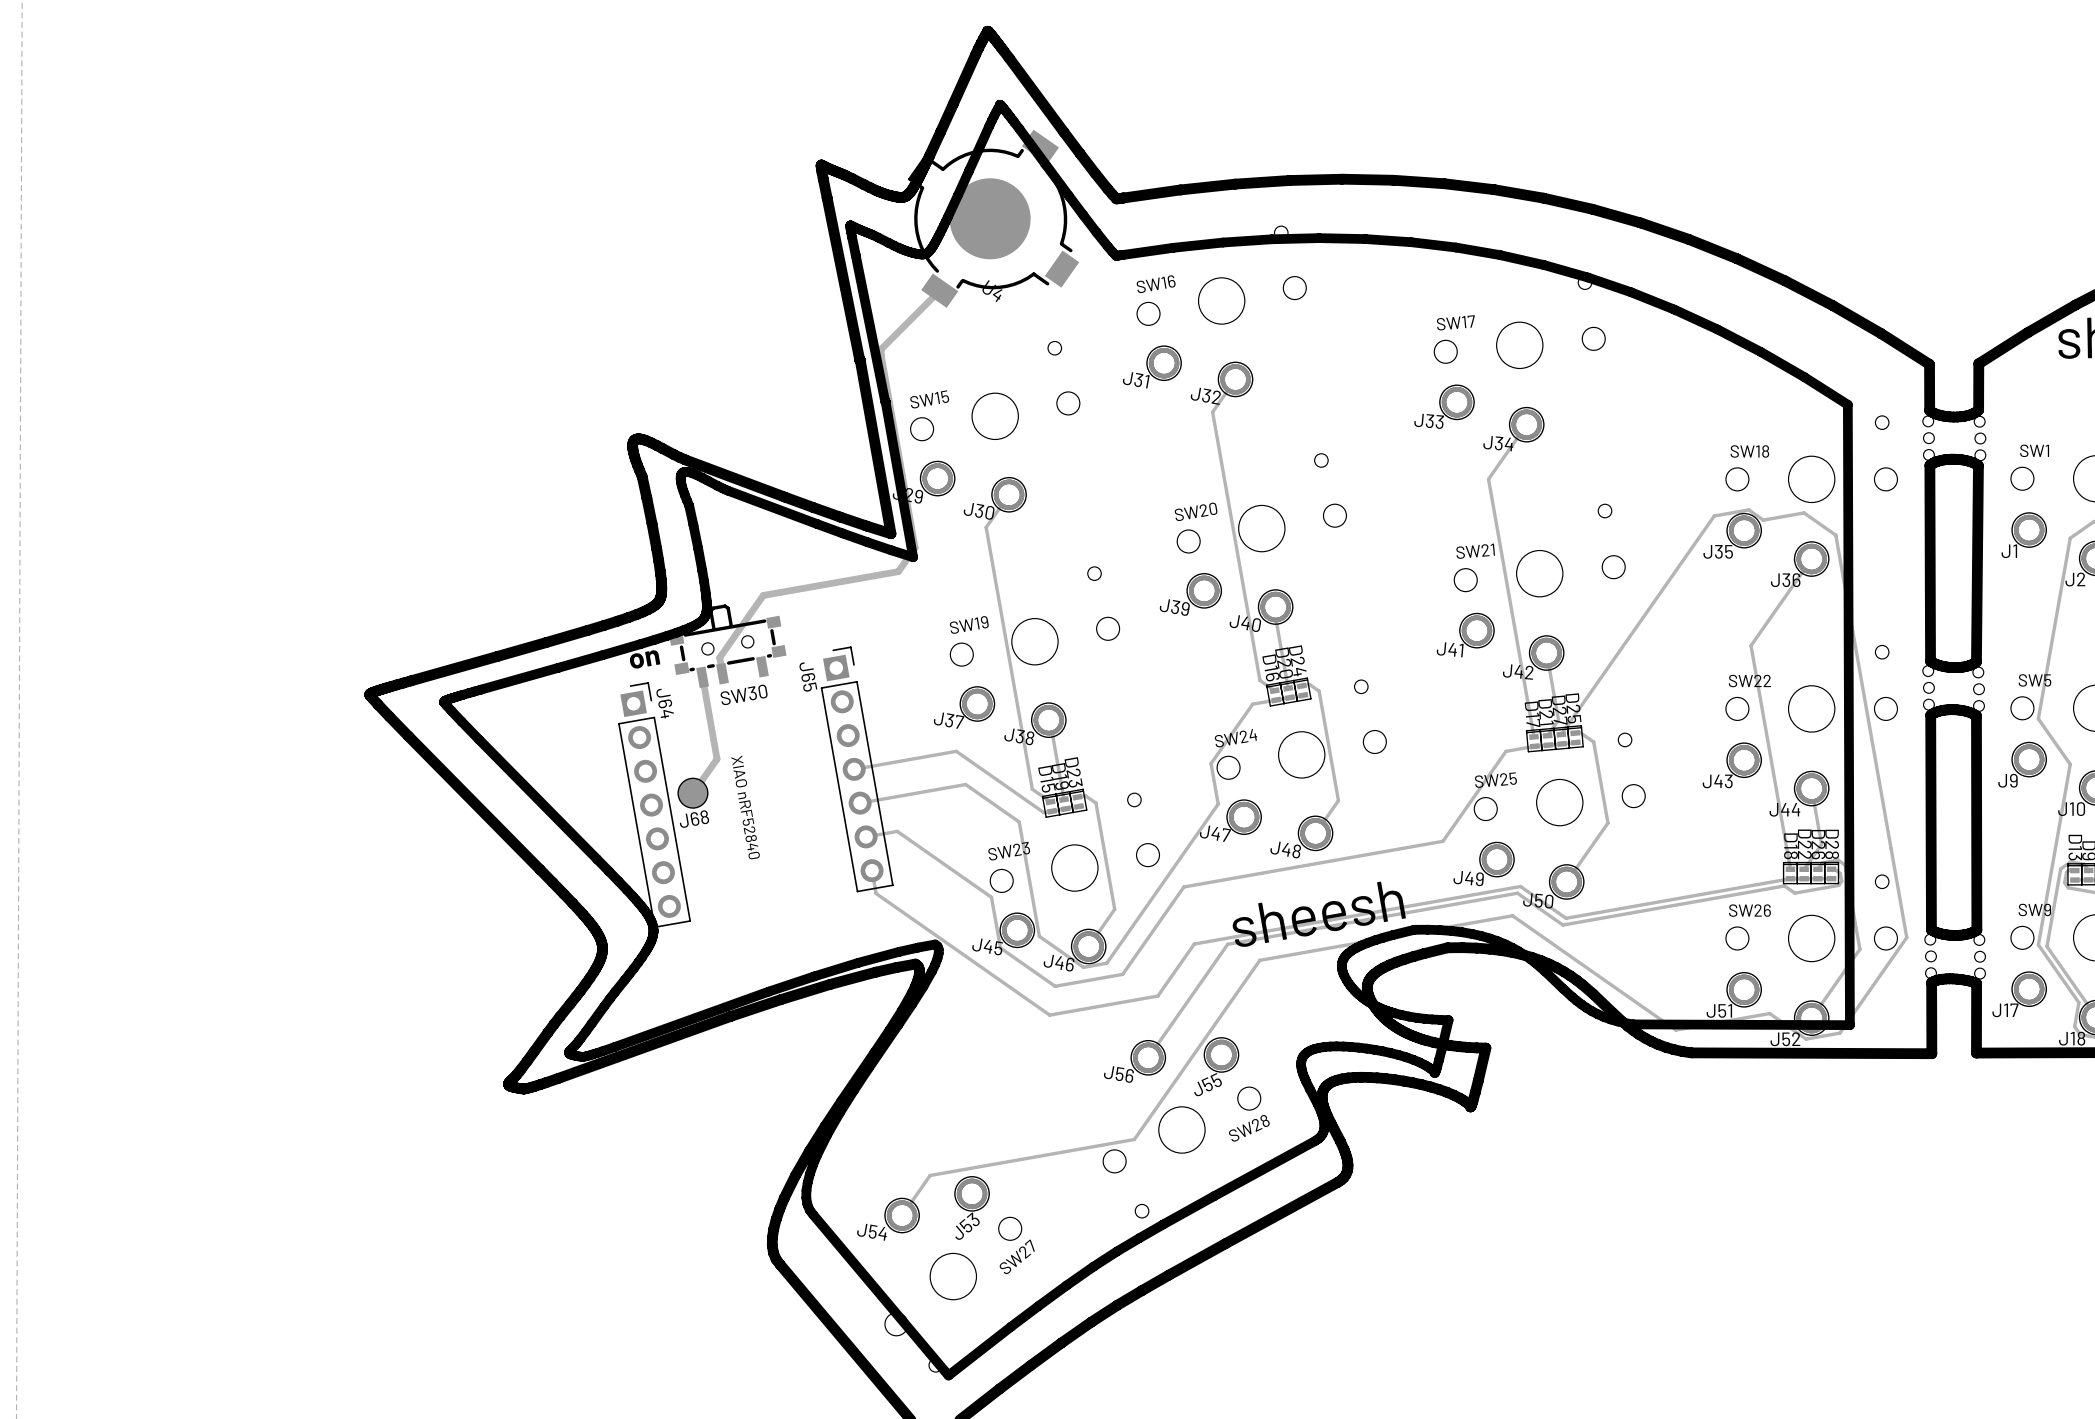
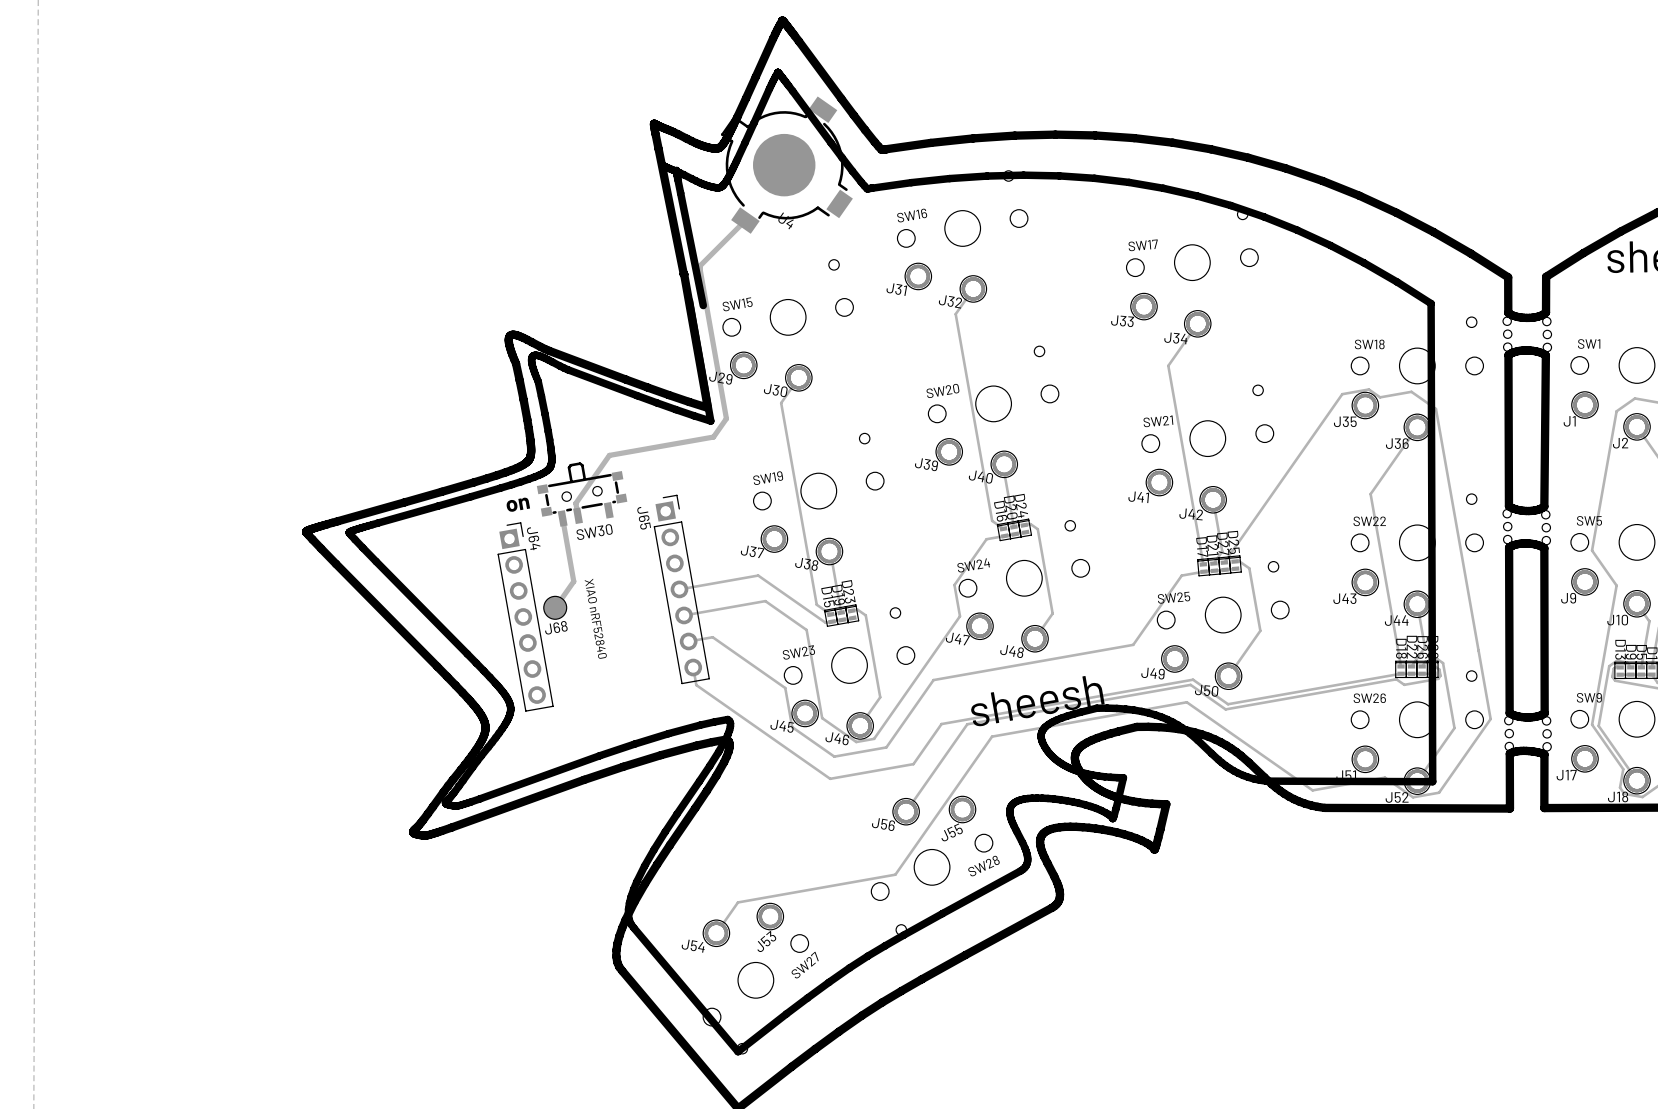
line: (1000, 104) (941, 229) (927, 252) (920, 254) (906, 251) (850, 225) -> (777, 72) (732, 168) (721, 186) (716, 187) (706, 185) (662, 165)
line: (1000, 105) (1116, 255) (1223, 242) (1319, 238) (1365, 239) (1456, 247) (1500, 255) (1587, 277) -> (778, 72) (867, 188) (949, 178) (1023, 175) (1059, 175) (1129, 182) (1163, 188) (1244, 210)
line: (1612, 285) (1674, 309) (1717, 329) (1760, 351) (1847, 404) (1849, 1025) (1633, 1024) (1617, 1021) (1597, 1014) (1581, 1004) (1535, 963) (1518, 951) (1490, 938) (1462, 932) (1414, 929) (1375, 940) (1351, 950) (1343, 960) (1342, 971) (1350, 985) (1363, 998) (1381, 1008) (1401, 1015) (1448, 1020) (1434, 1073) -> (1264, 216) (1330, 245) (1363, 262) (1431, 303) (1432, 781) (1266, 781) (1253, 778) (1238, 773) (1225, 765) (1177, 724) (1155, 715) (1134, 710) (1096, 708) (1066, 716) (1048, 724) (1042, 731) (1041, 740) (1047, 751) (1058, 761) (1071, 768) (1087, 773) (1123, 777) (1112, 818)
line: (885, 401) (913, 557) (817, 524) (727, 490) (693, 473) (684, 471) (680, 475) (680, 481) (689, 505) (705, 594) (706, 611) (702, 620) (690, 627) (655, 639) (445, 700) -> (689, 300) (710, 421) (637, 395) (534, 355) (531, 357) (531, 362) (538, 381) (551, 449) (551, 463) (548, 469) (538, 475) (511, 484) (350, 531)
line: (444, 703) (626, 889) (644, 910) (652, 923) (652, 936) (645, 951) (569, 1050) (570, 1054) (582, 1056) (597, 1053) (768, 991) (858, 962) (918, 947) (935, 944) (937, 946) (937, 958) (923, 986) (853, 1090) (827, 1134) (809, 1174) (806, 1197) (809, 1210) (813, 1215) (948, 1375) (1038, 1306) (1116, 1251) (1318, 1138) (1323, 1131) (1324, 1122) (1302, 1071) (1301, 1059) (1307, 1052) (1330, 1046) (1374, 1049) (1413, 1059) (1428, 1067) (1434, 1073) -> (349, 533) (490, 677) (503, 693) (509, 703) (510, 713) (504, 725) (446, 801) (446, 804) (456, 806) (467, 803) (599, 755) (668, 733) (714, 721) (727, 719) (729, 721) (729, 730) (718, 751) (644, 866) (631, 896) (628, 914) (633, 928) (738, 1051) (807, 998) (867, 956) (1022, 869) (1027, 863) (1027, 856) (1010, 817) (1010, 807) (1014, 802) (1032, 798) (1066, 800) (1096, 808) (1112, 818)

